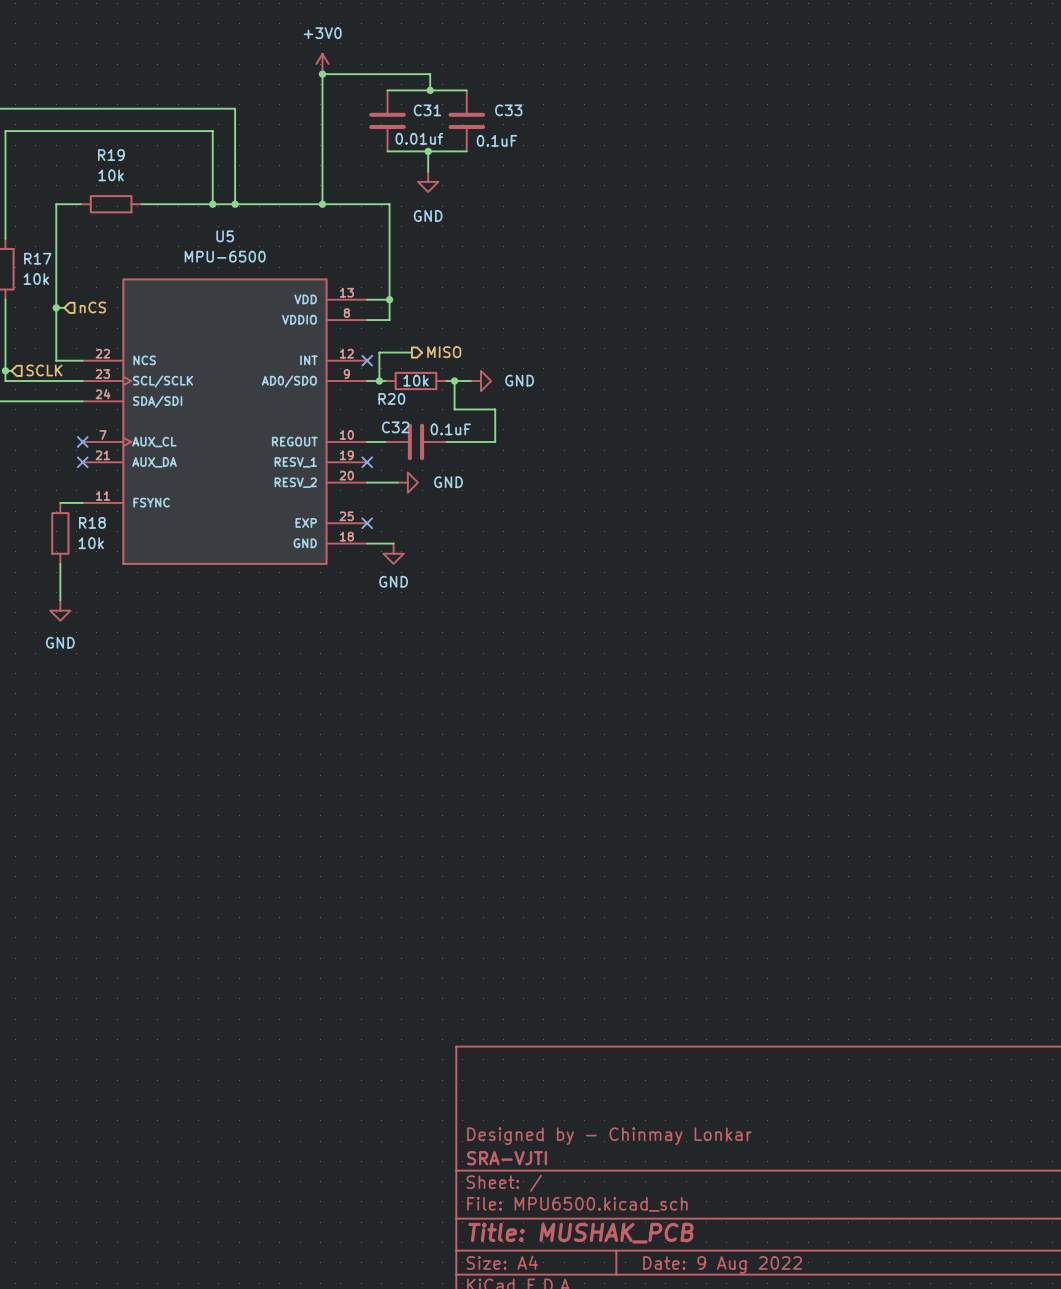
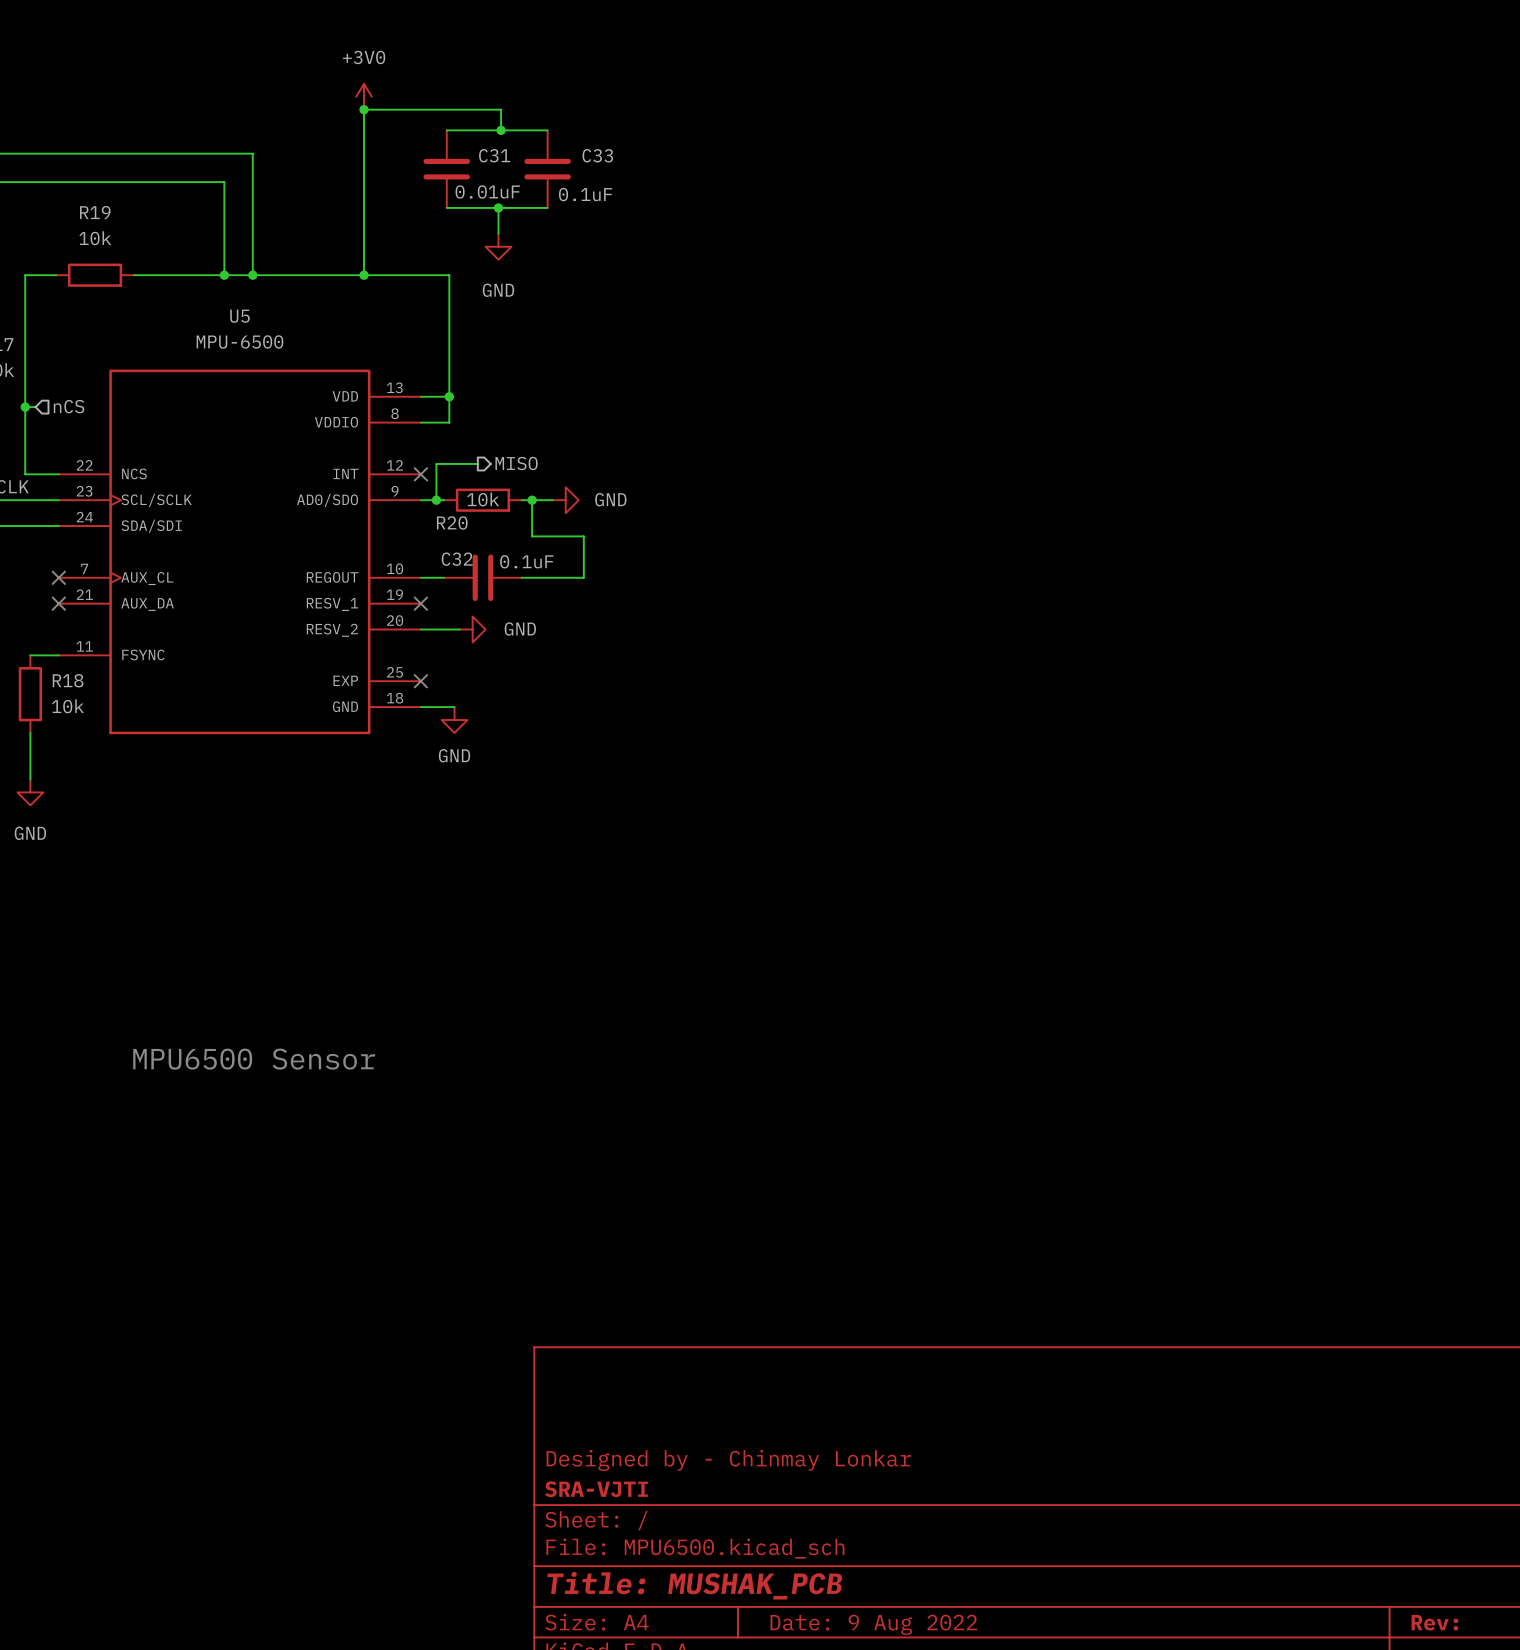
C31 value: 0.01uf (419, 138) -> 0.01uF (487, 191)
text: none -> MPU6500 Sensor (254, 1059)

